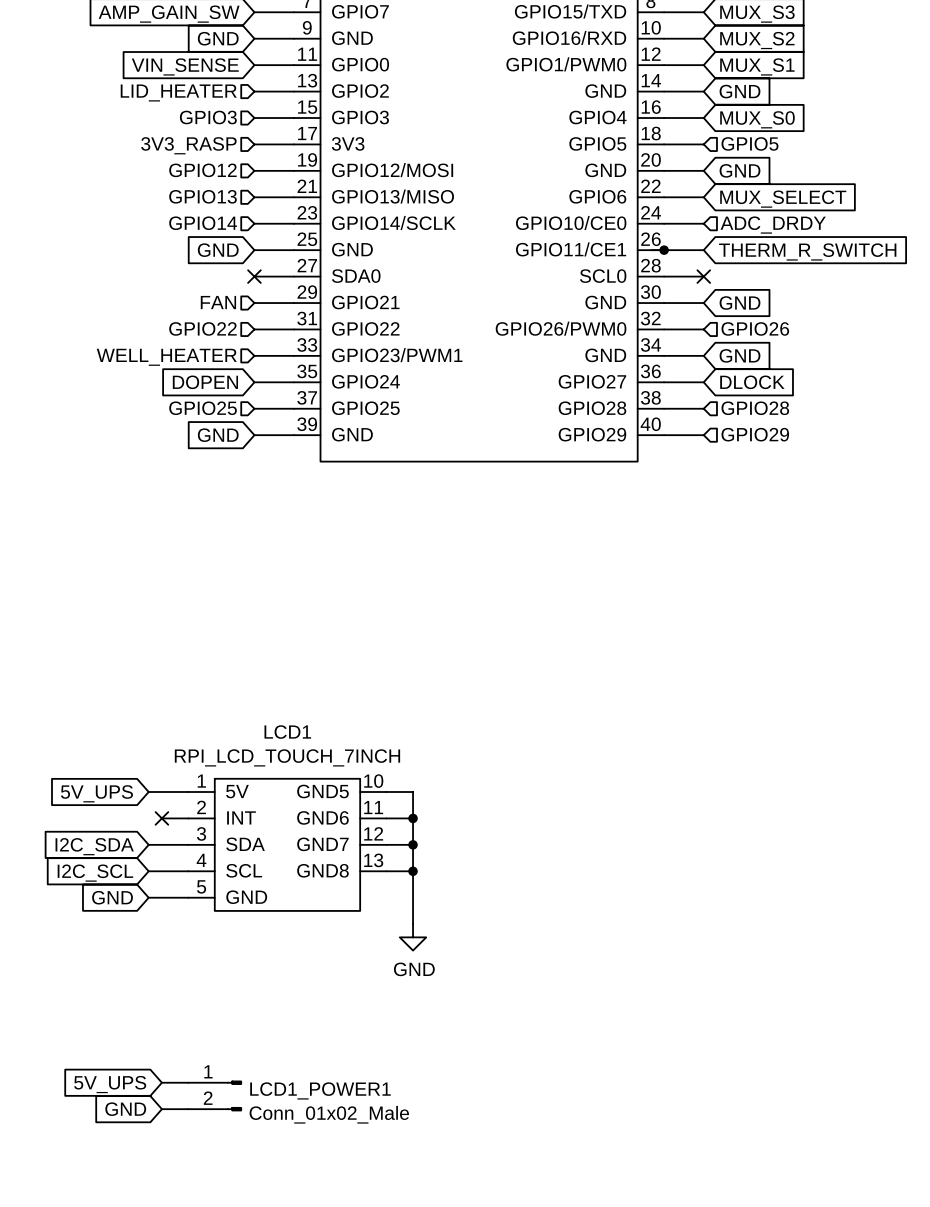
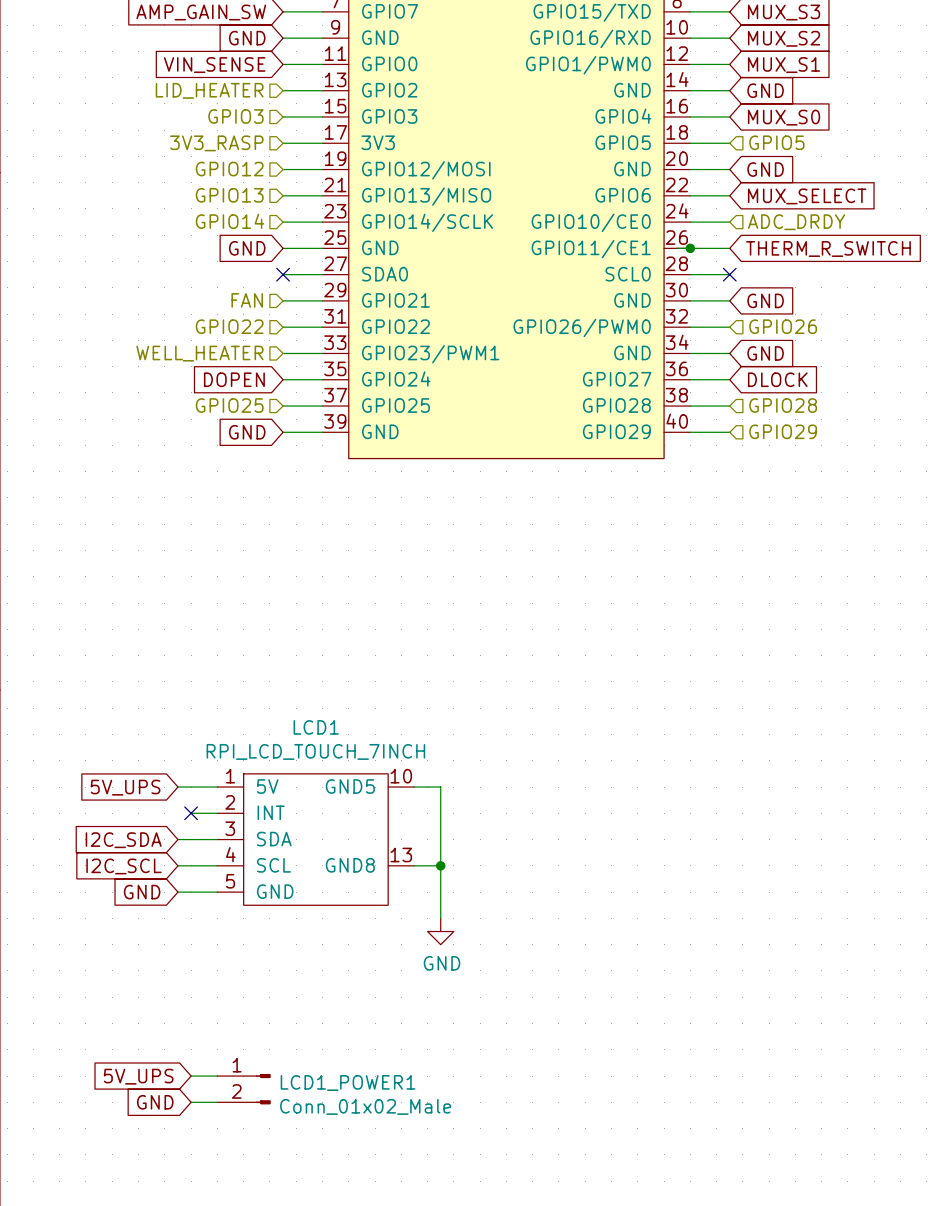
LCD1 symbol: [188, 778, 387, 911] -> [217, 773, 415, 906]
wire: (386, 818) (413, 818) -> none
junction: (413, 818) -> none
wire: (386, 844) (413, 844) -> none
junction: (413, 844) -> none

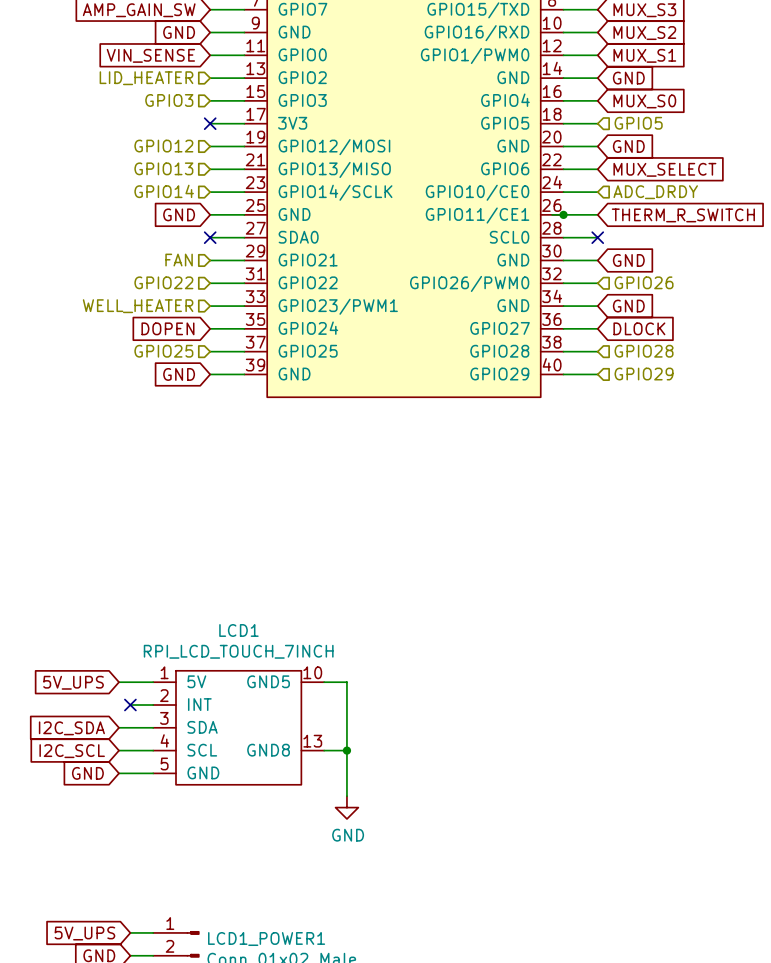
hierarchical label: 3V3_RASP (216, 143) -> none
no-connect mark: none -> (210, 123)

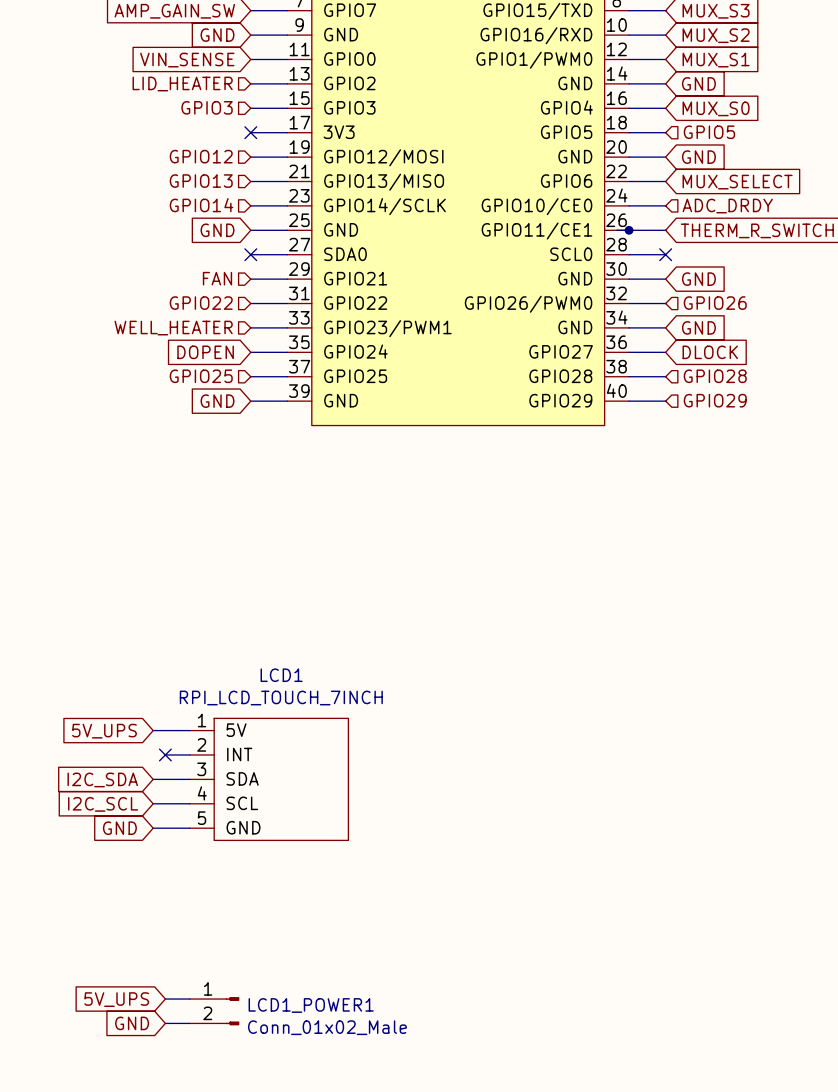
LCD1 symbol: [153, 670, 325, 785] -> [189, 718, 349, 841]
wire: (324, 682) (346, 682) (346, 796) -> none
wire: (324, 750) (346, 750) -> none
junction: (346, 750) -> none
power symbol: GND (346, 807) -> none

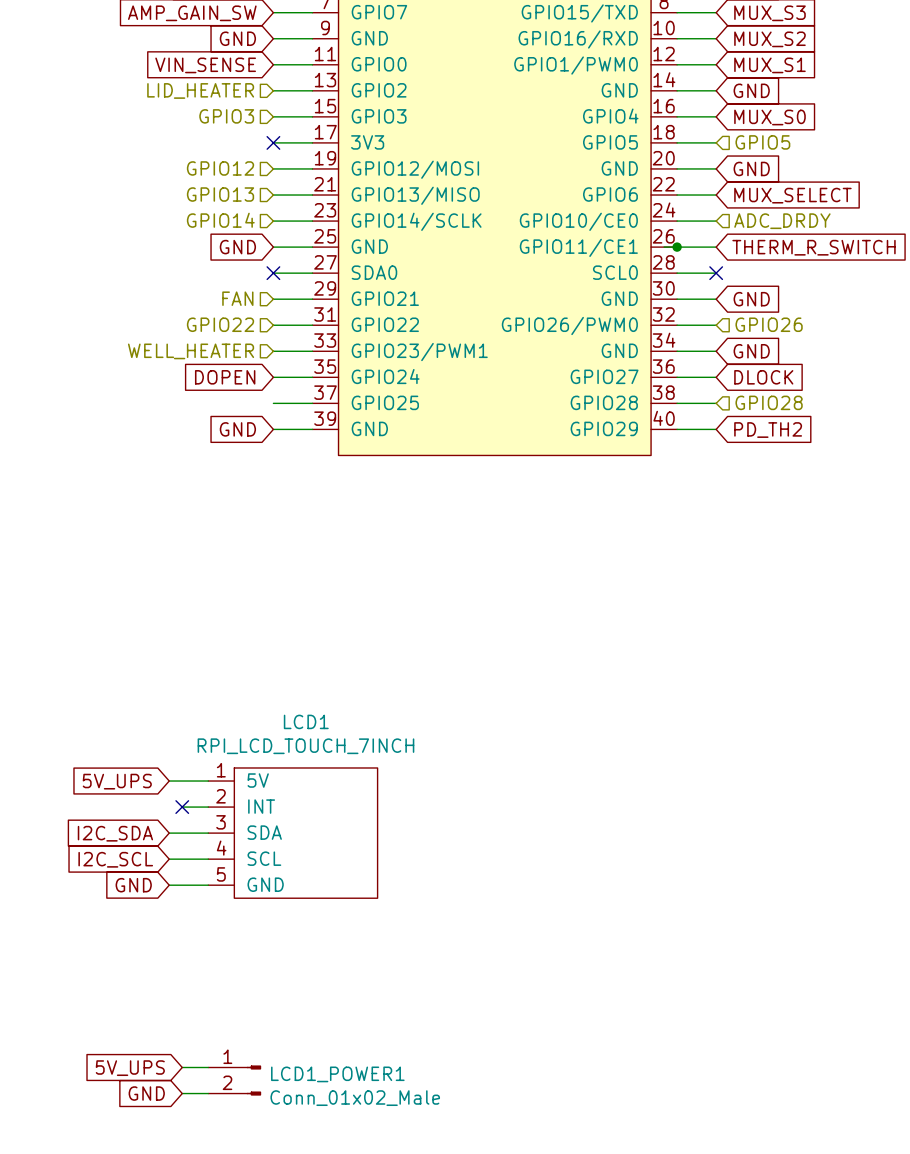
hierarchical label: GPIO25 (201, 376) -> none
hierarchical label: GPIO29 (715, 400) -> none
global label: none -> PD_TH2 (768, 430)

